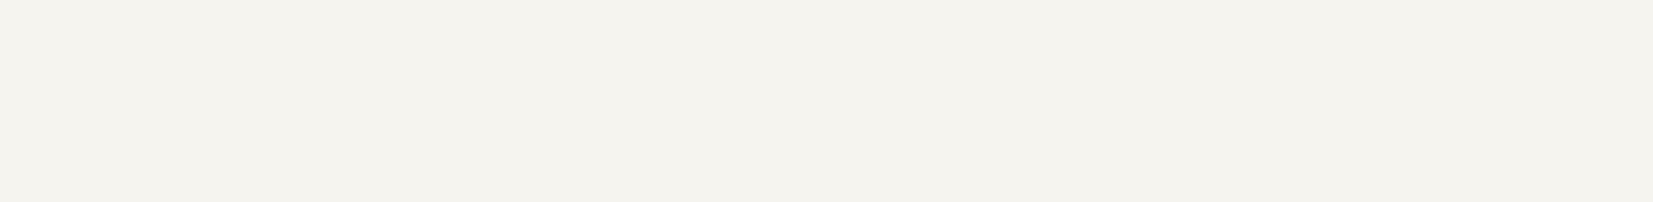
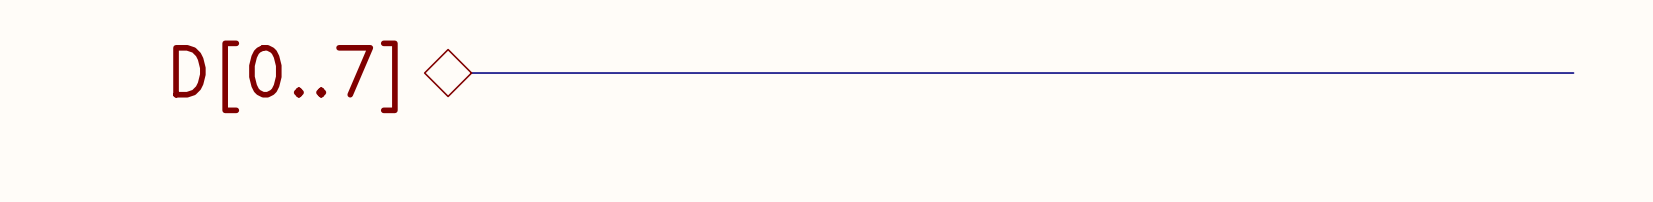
bus: none -> (471, 73) (1573, 73)
hierarchical label: none -> D[0..7] (285, 76)

